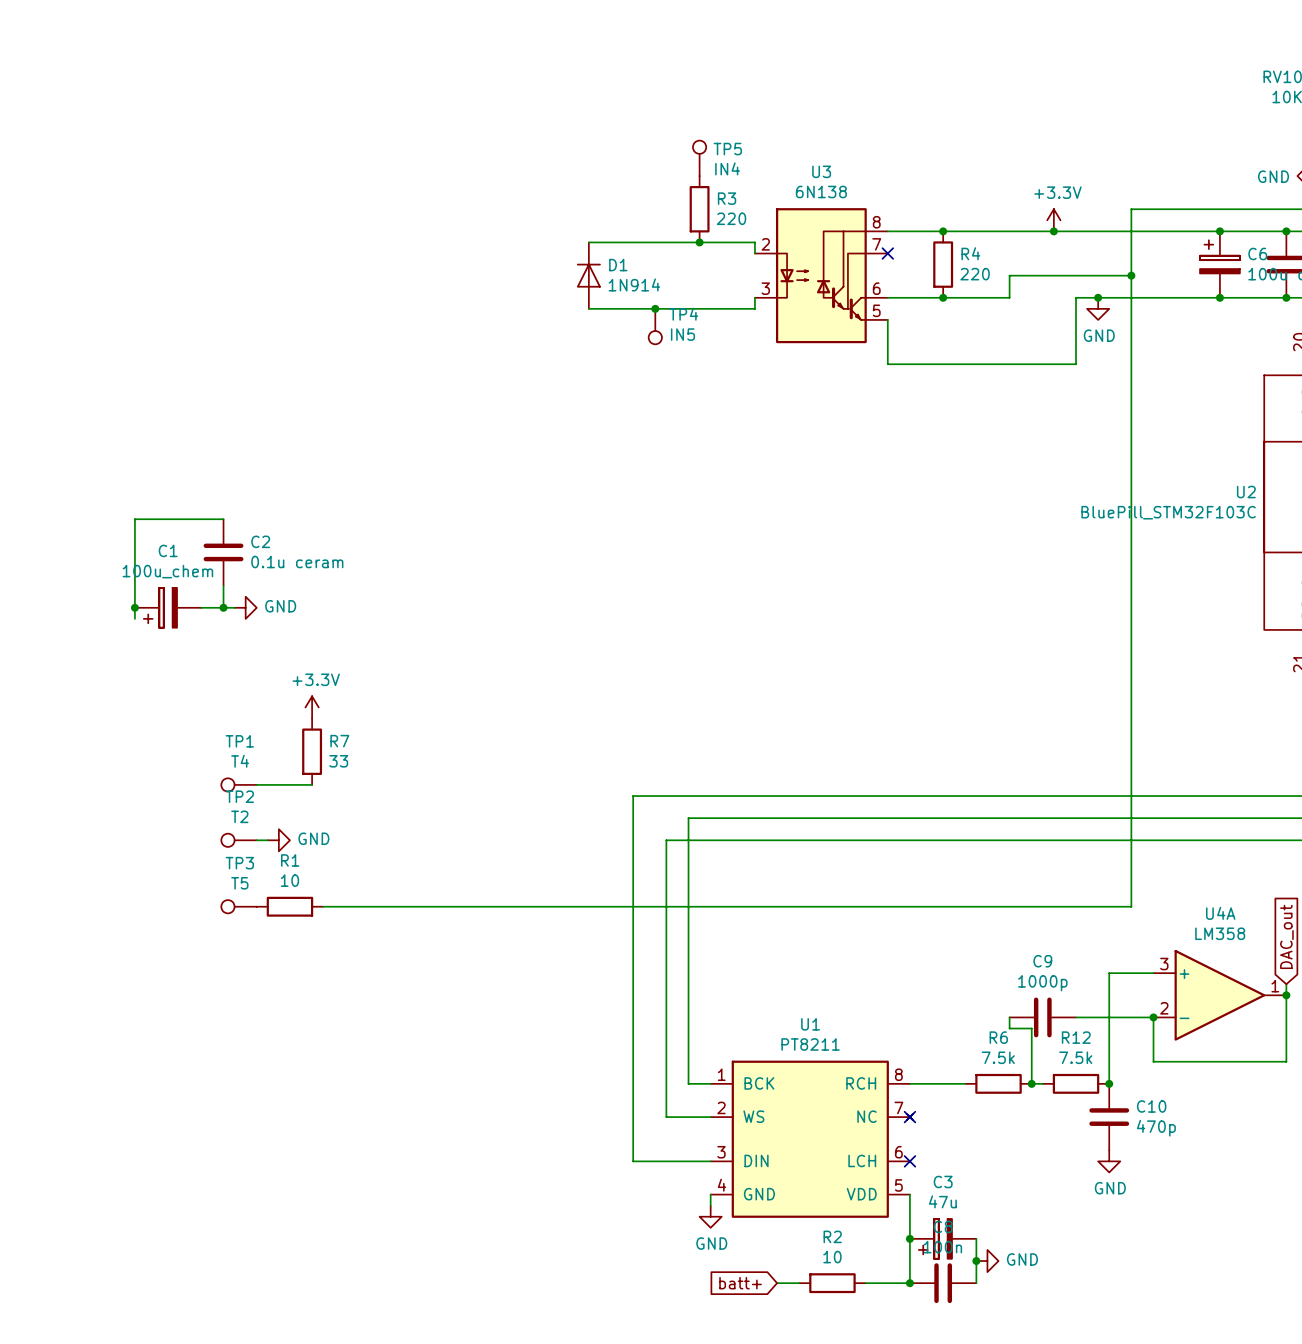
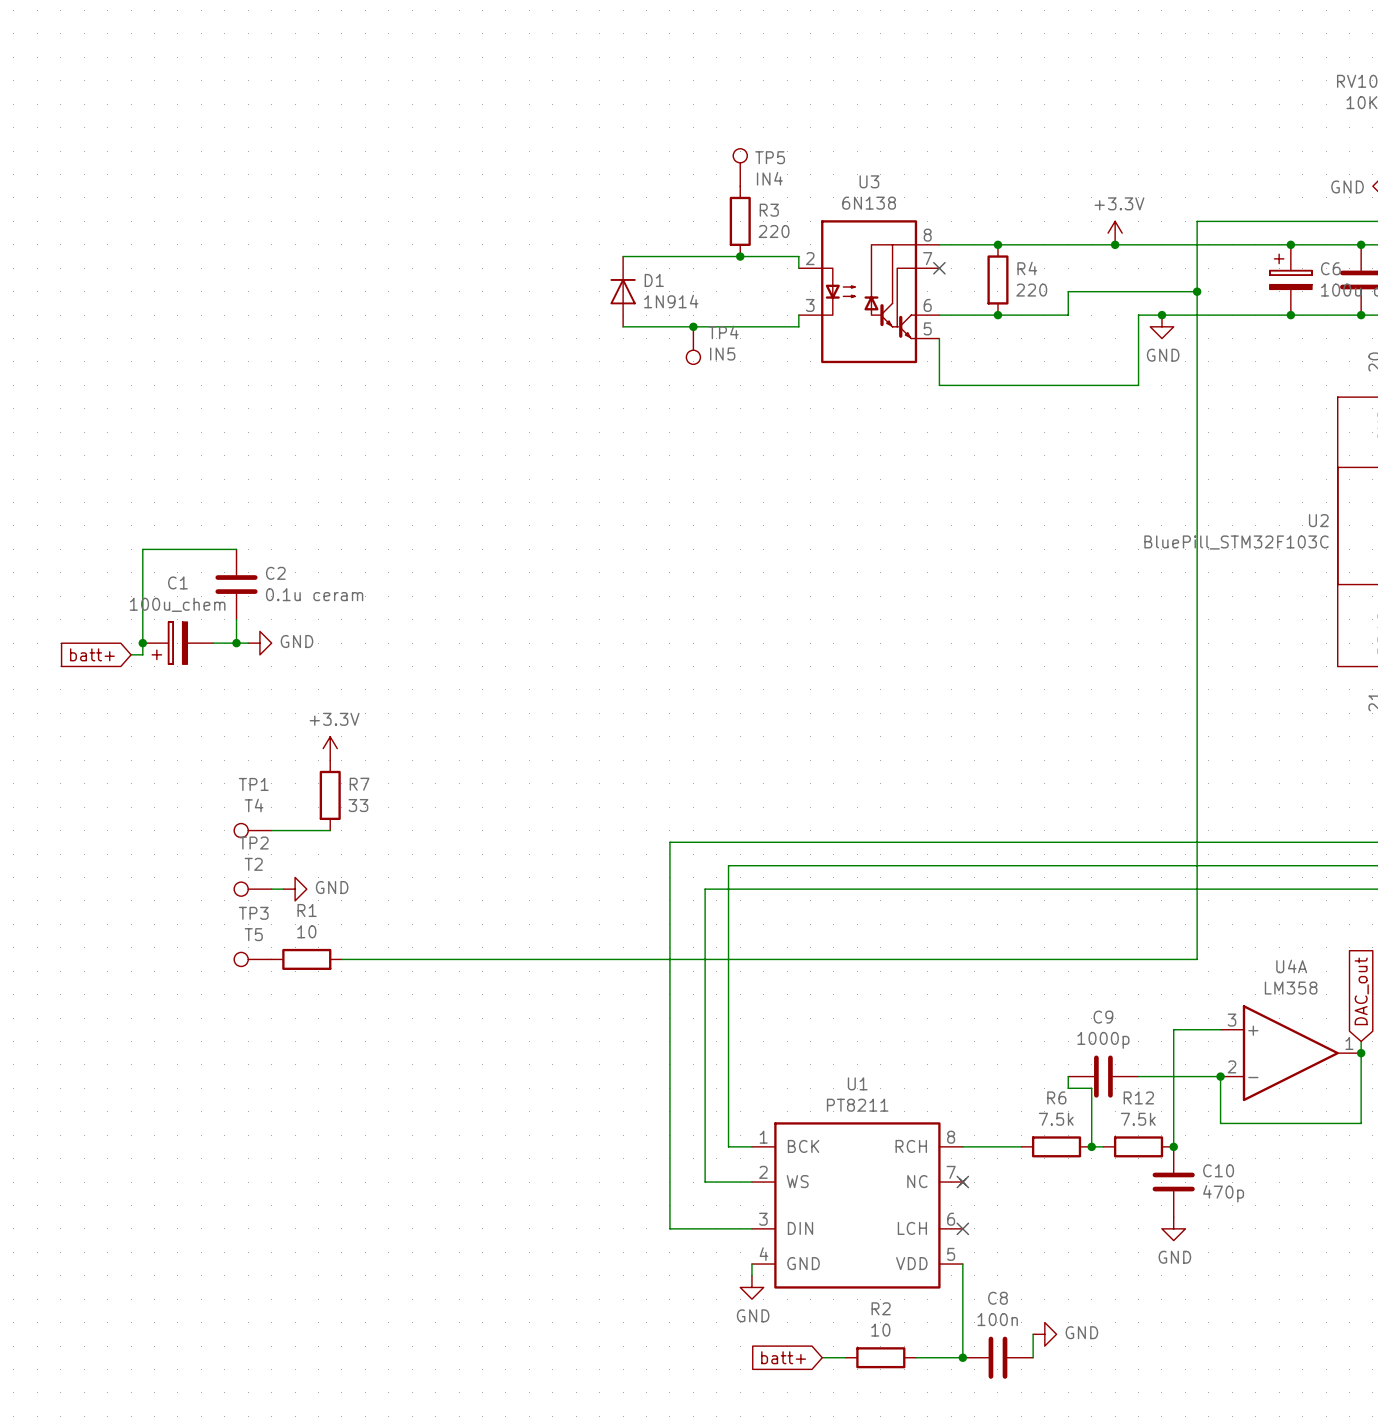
global label: none -> batt+ (92, 654)
wire: none -> (131, 654) (142, 654)
junction: (909, 1238) -> none
C3: 47u (943, 1238) -> none
wire: (976, 1238) (976, 1261) -> none
junction: (976, 1261) -> none

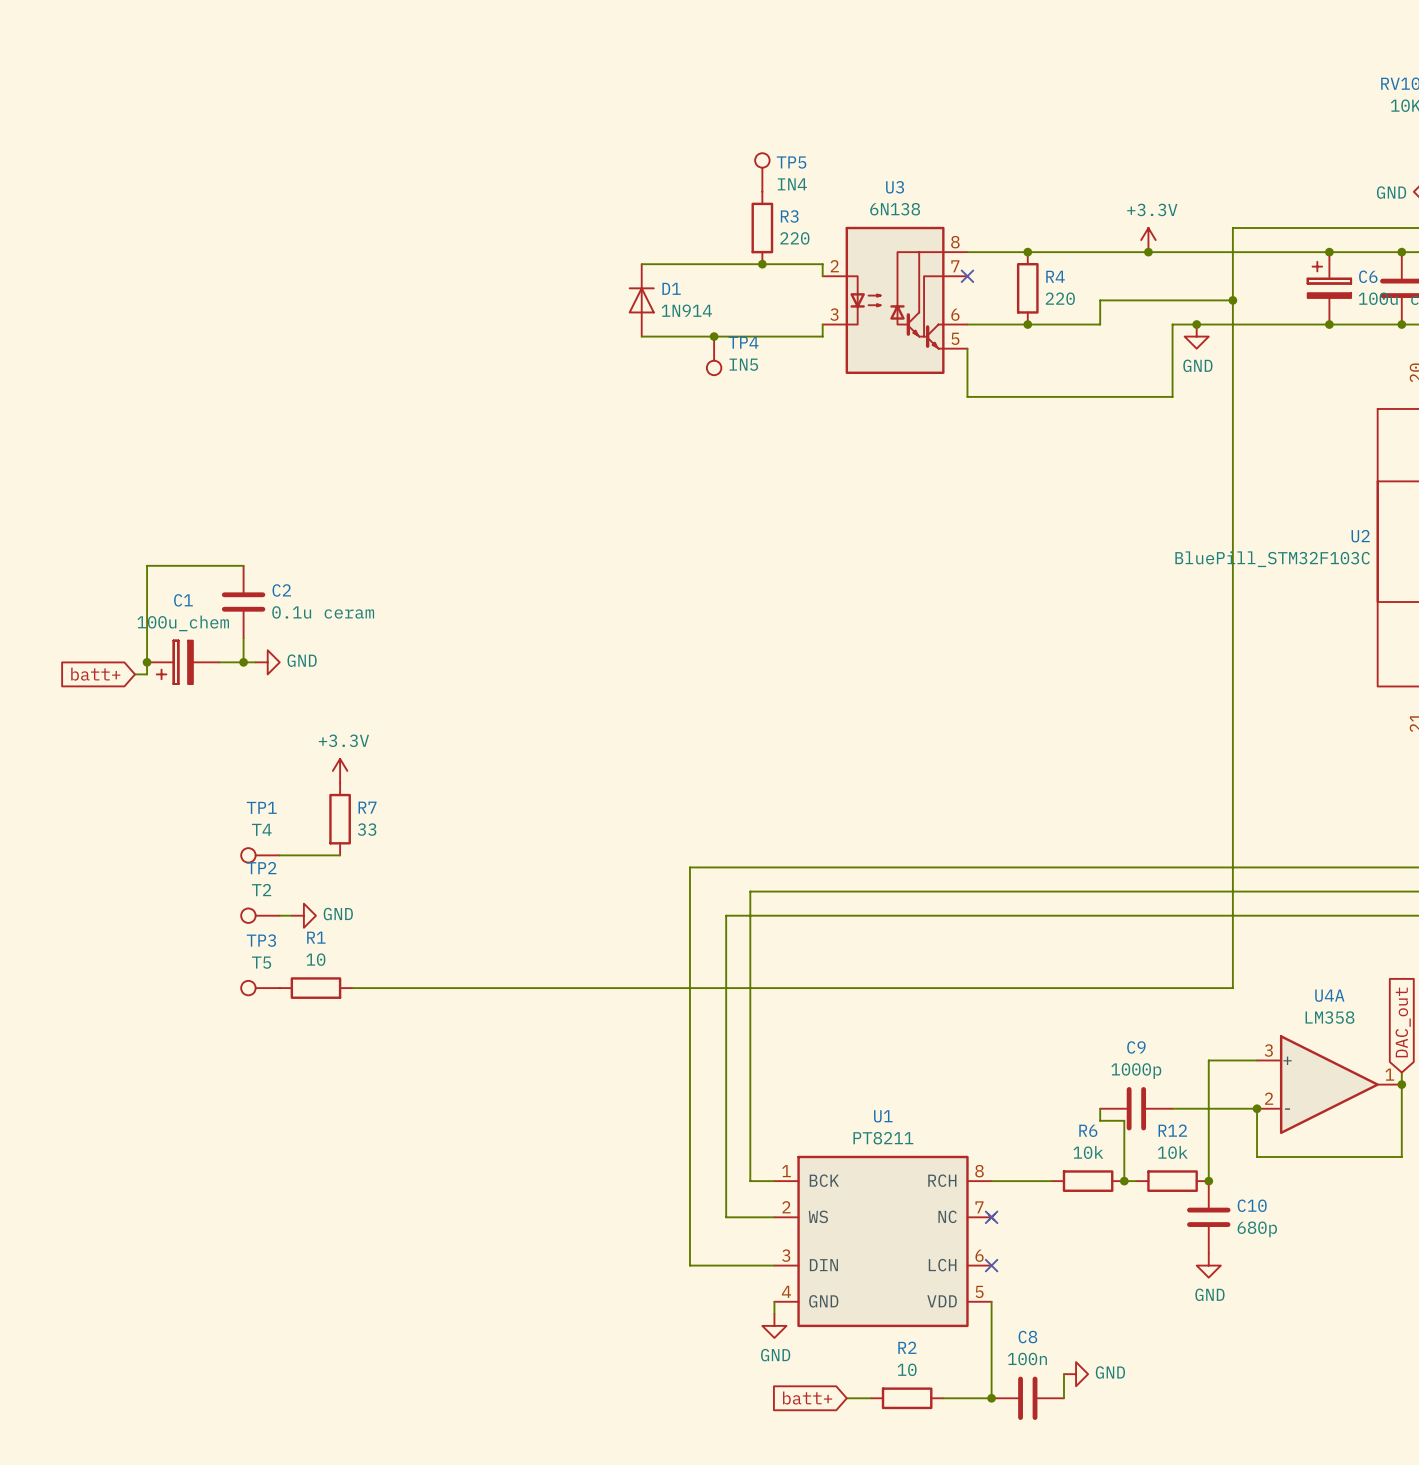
R6 value: 7.5k (1056, 1119) -> 10k (1088, 1152)
R12 value: 7.5k (1138, 1119) -> 10k (1172, 1152)
C10 value: 470p (1223, 1193) -> 680p (1257, 1229)

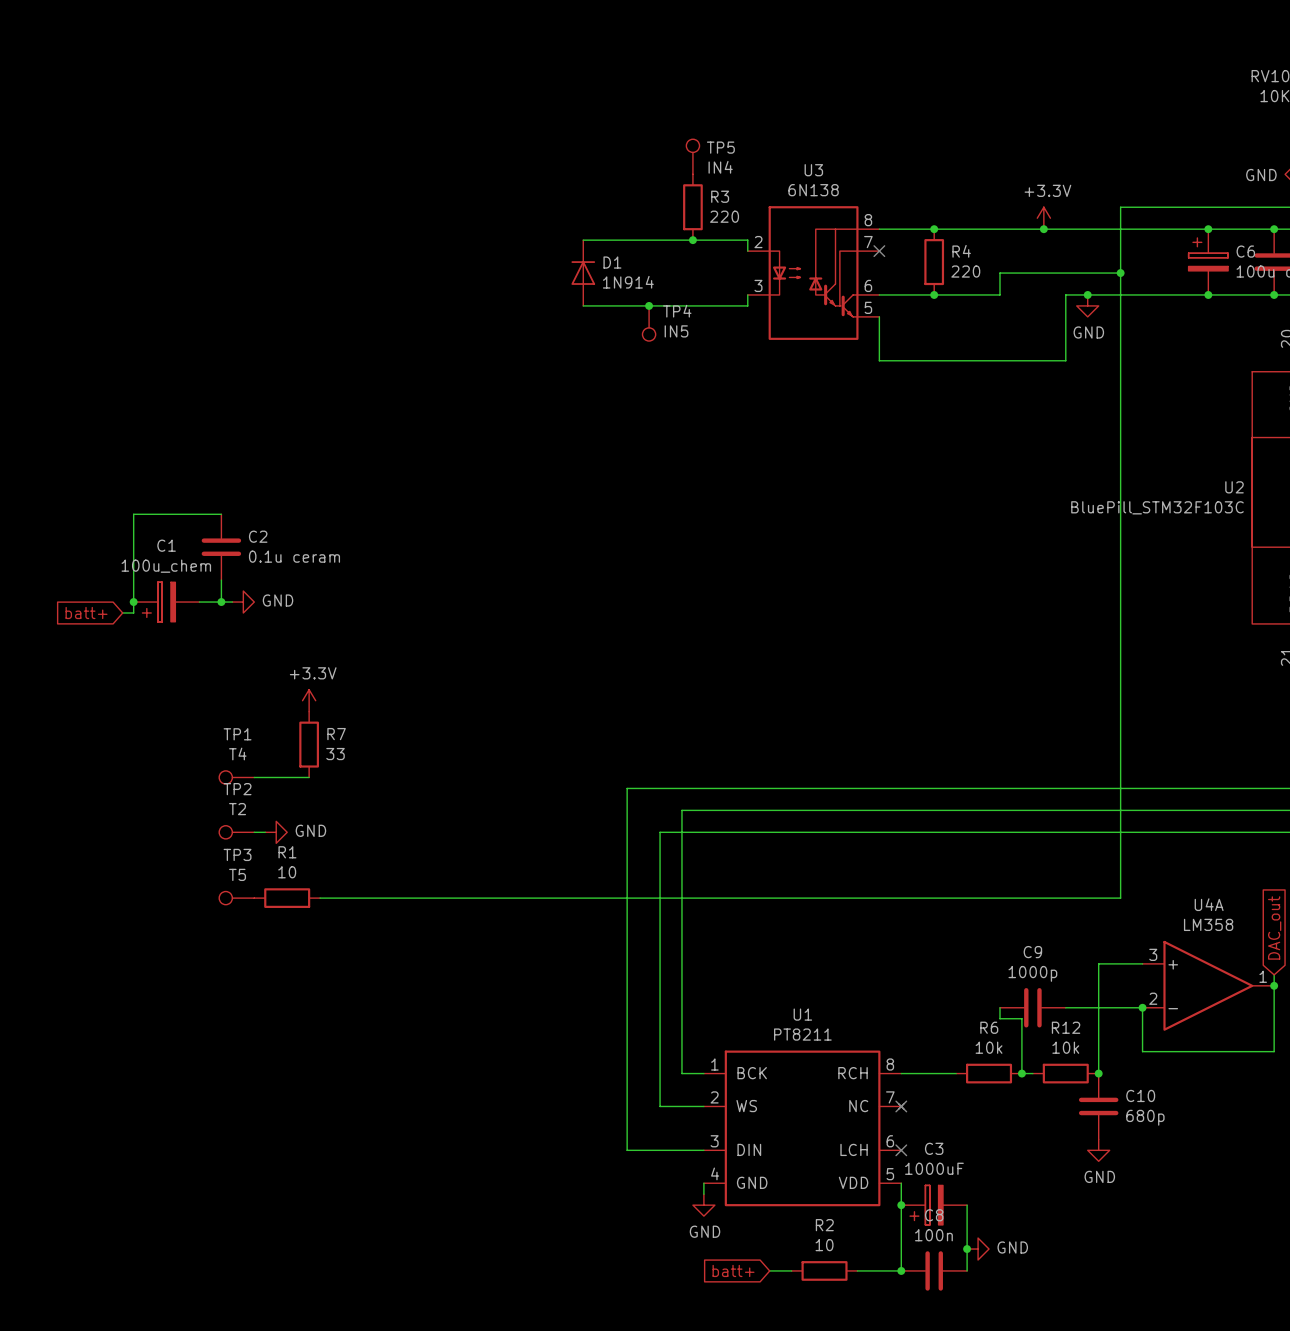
junction: none -> (901, 1205)
C3: none -> 1000uF (934, 1205)
wire: none -> (967, 1205) (967, 1249)
junction: none -> (967, 1249)

